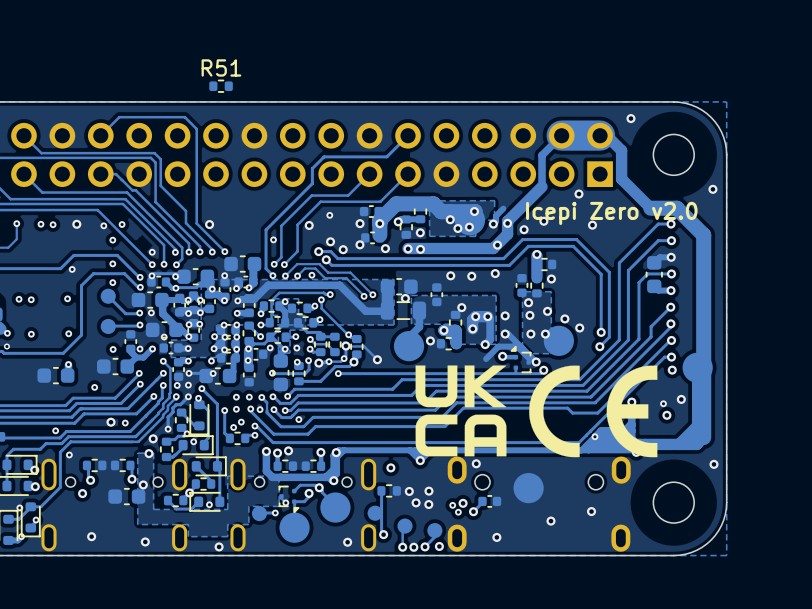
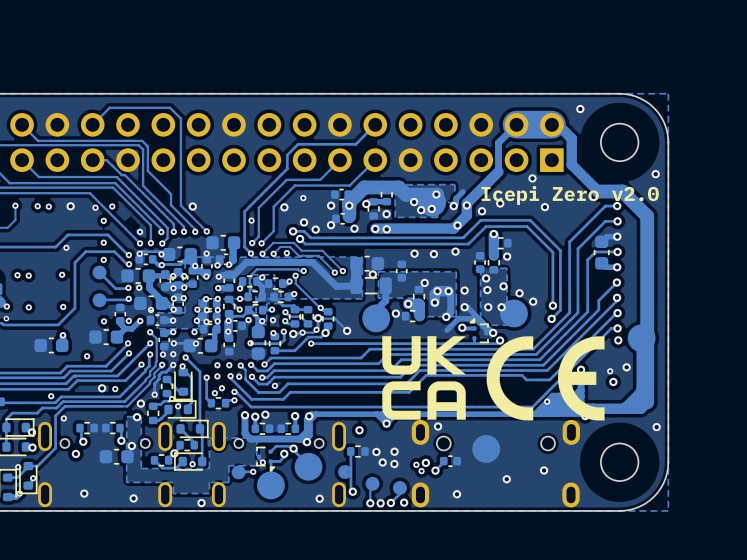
R51: (221, 86) -> none

